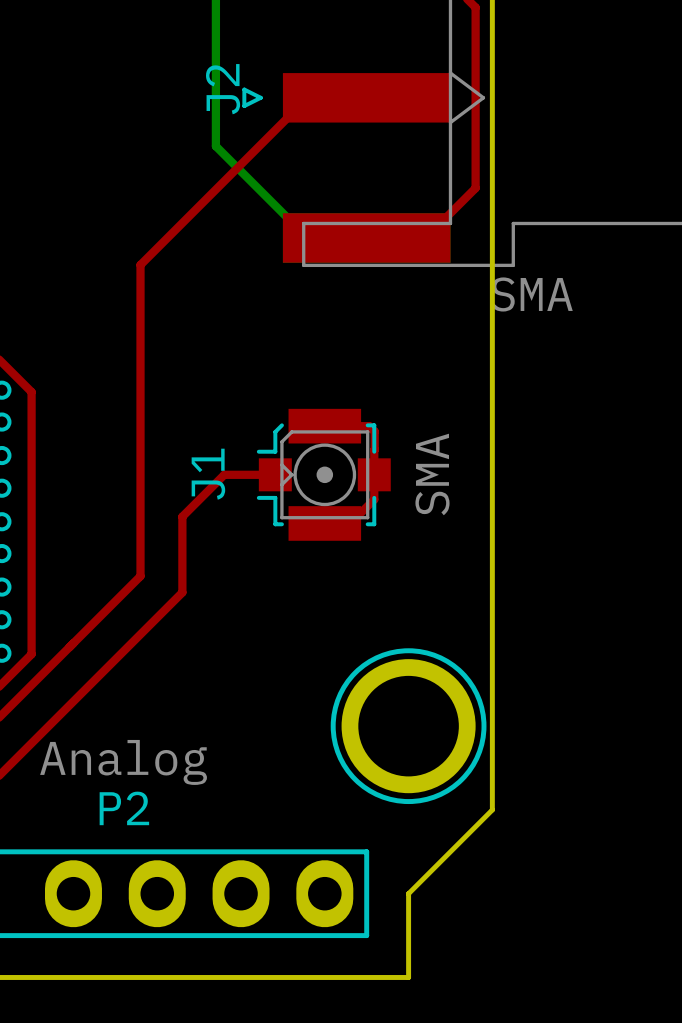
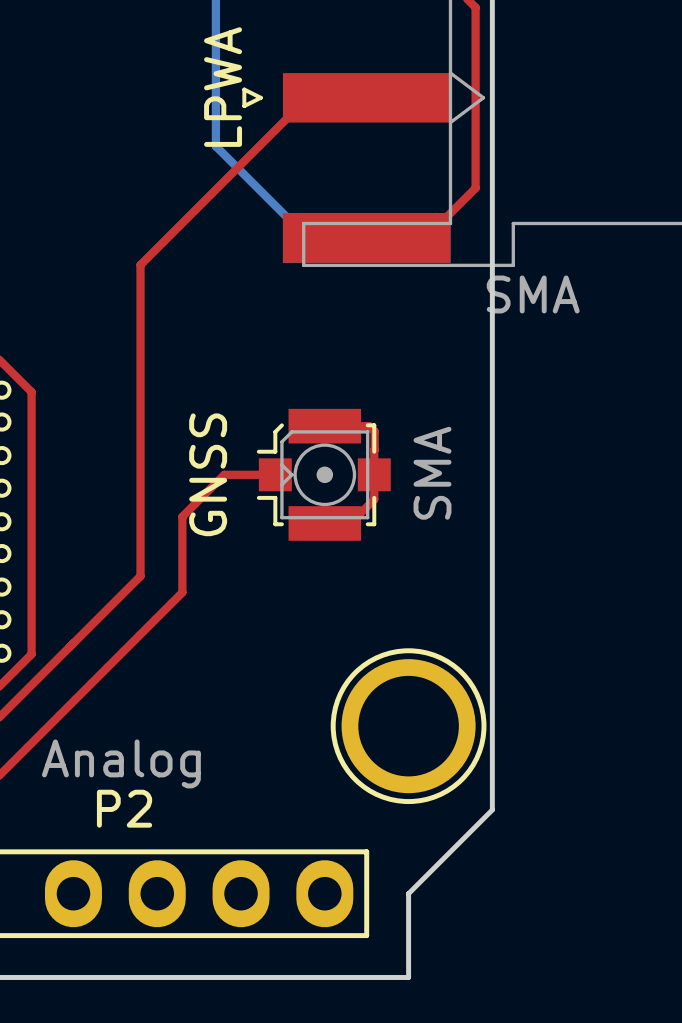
J2 name: J2 (223, 89) -> LPWA (223, 87)
J1 name: J1 (208, 474) -> GNSS (208, 474)

